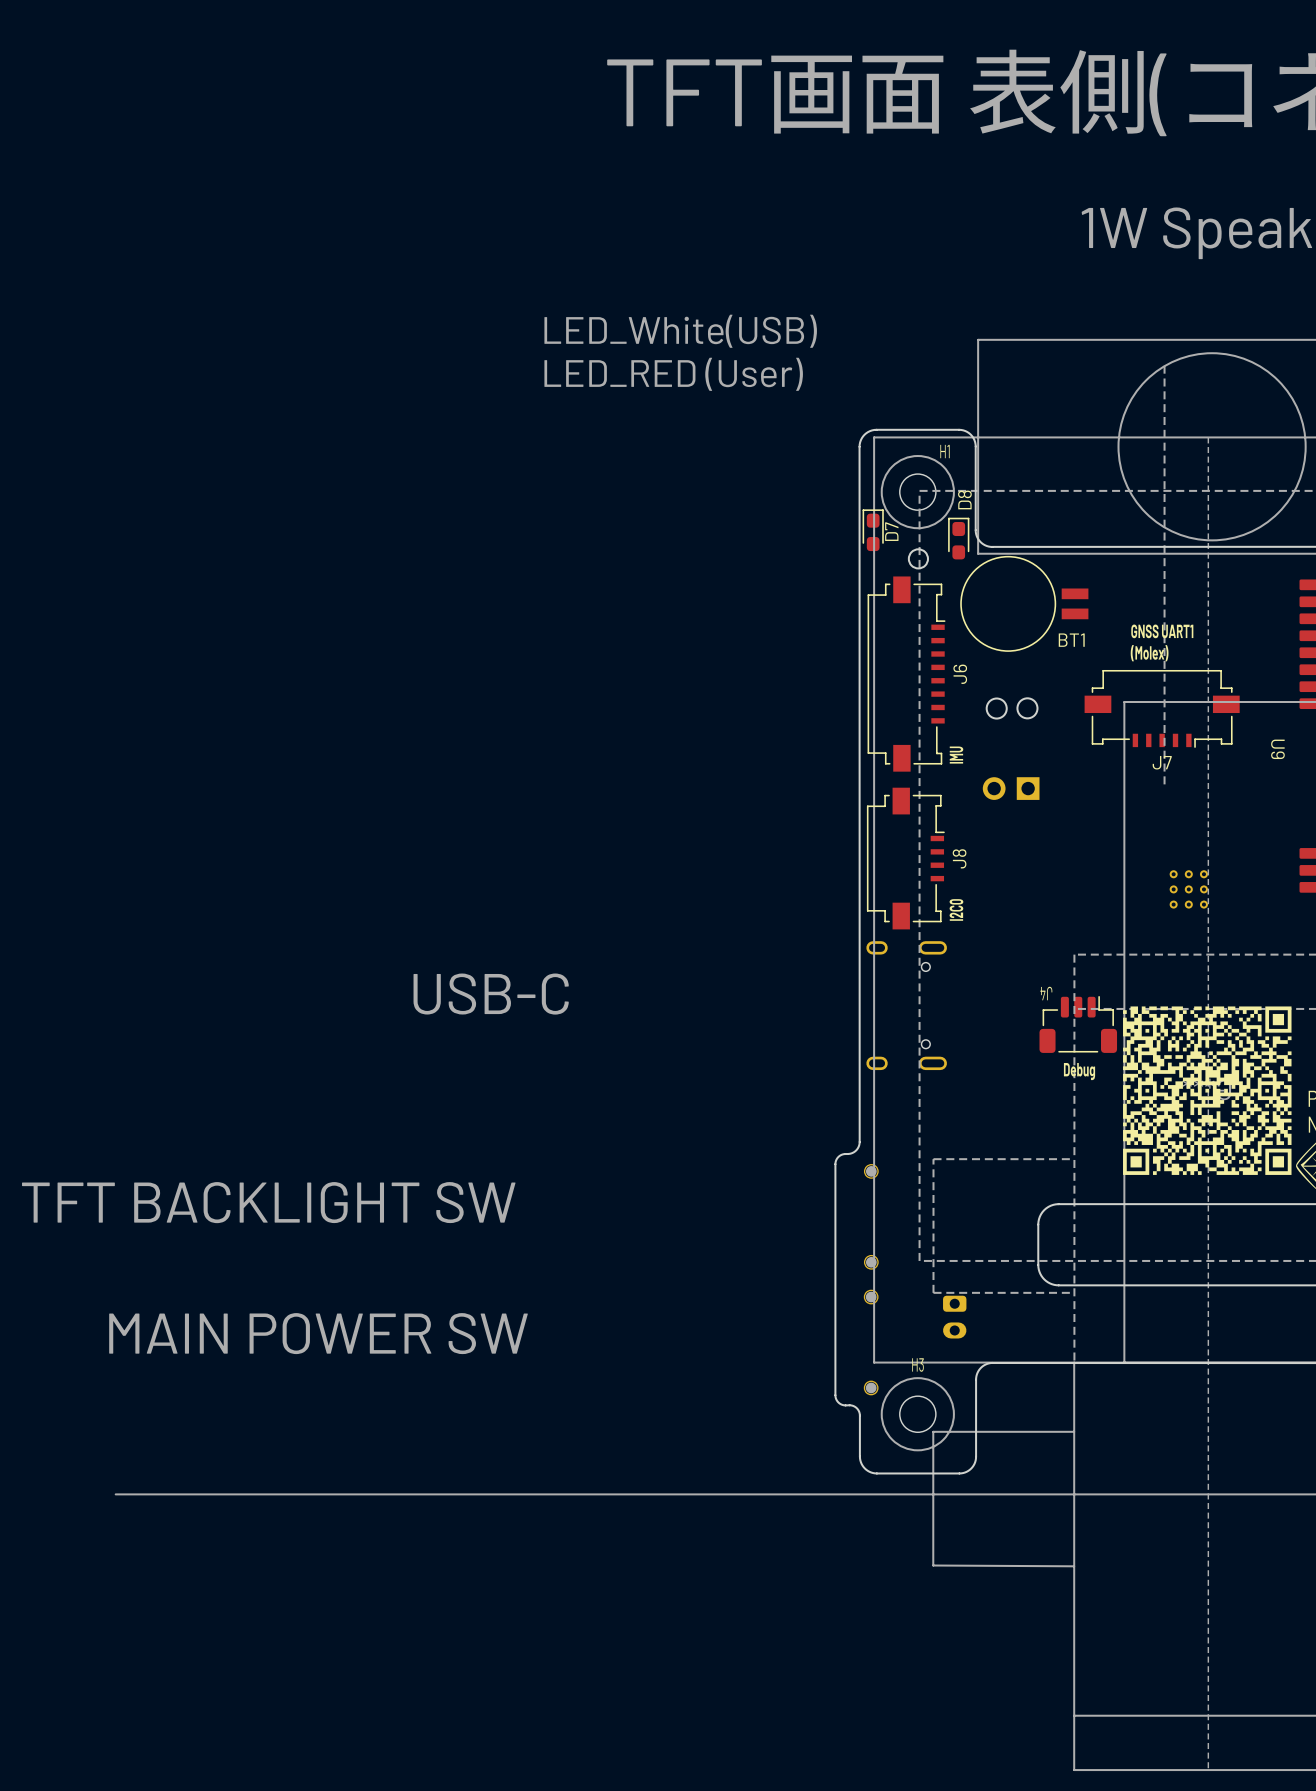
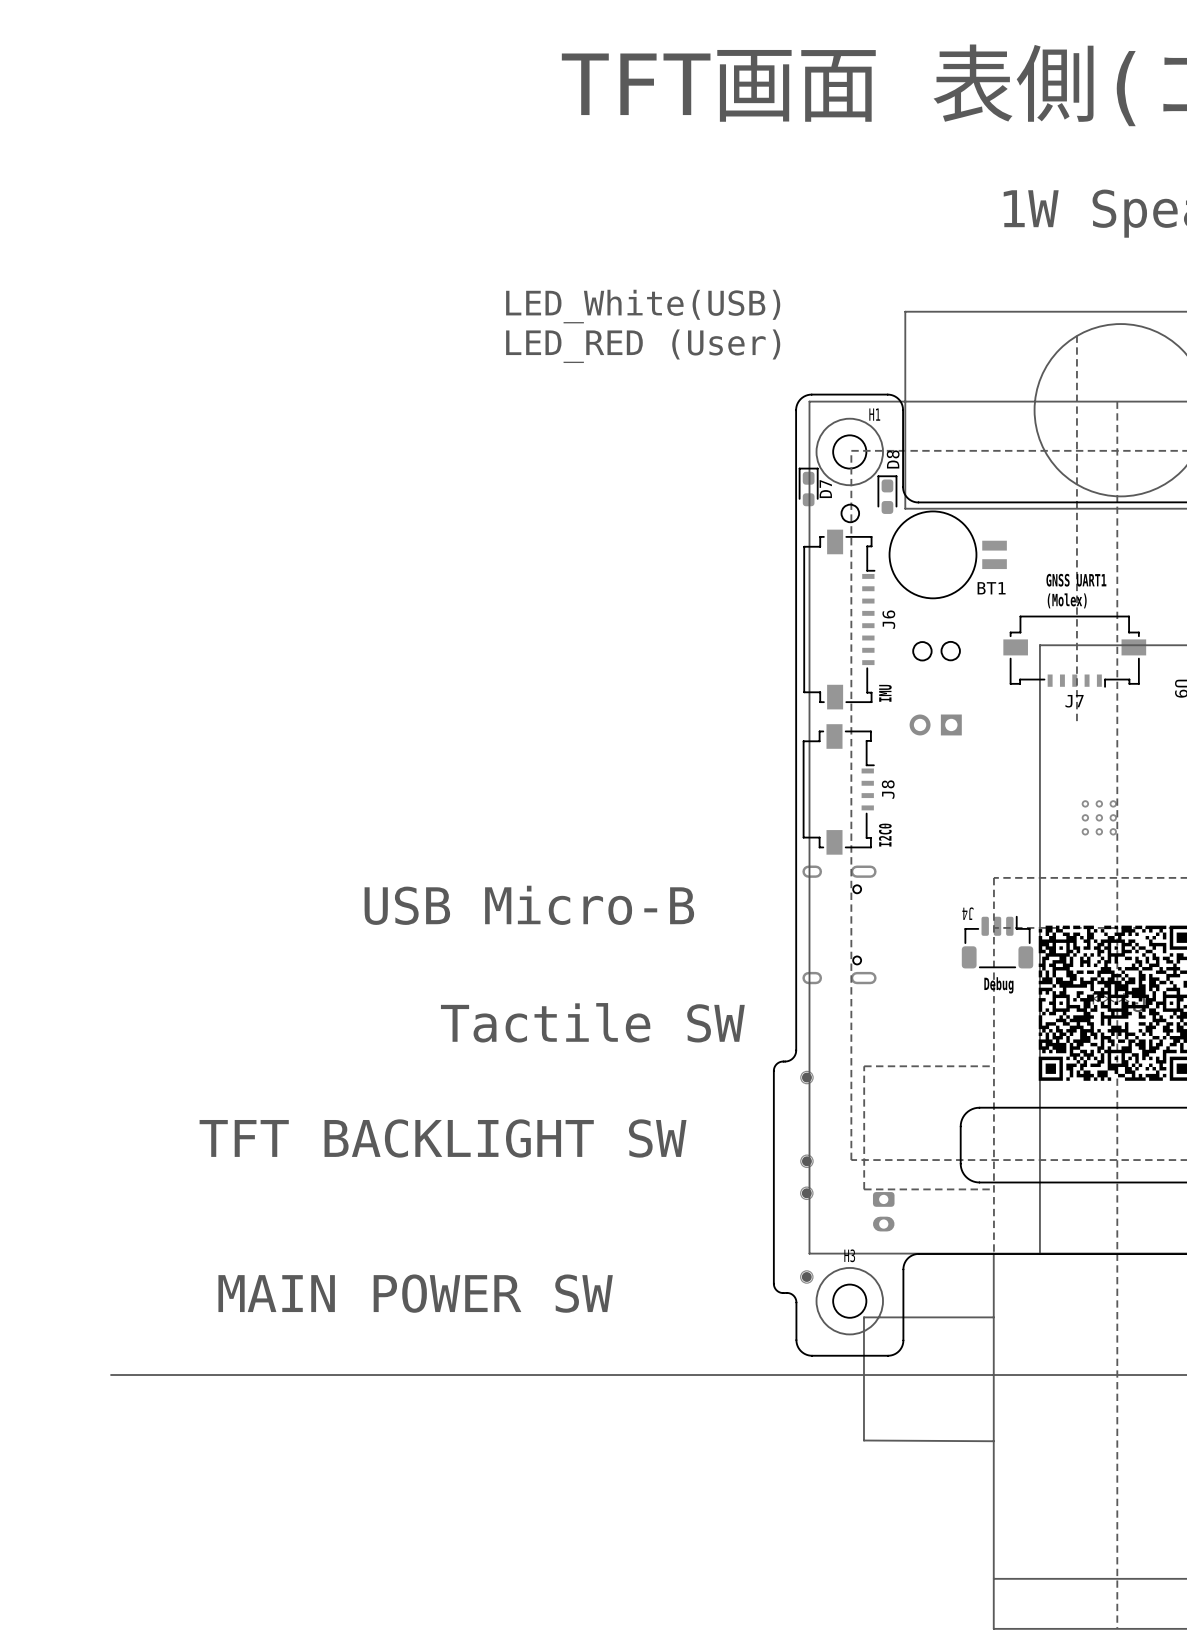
text: none -> USB Micro-B (529, 905)
text: USB-C (491, 994) -> none
text: none -> Tactile SW (592, 1022)
text position: TFT BACKLIGHT SW (268, 1202) -> TFT BACKLIGHT SW (443, 1138)
text position: MAIN POWER SW (318, 1333) -> MAIN POWER SW (415, 1293)

